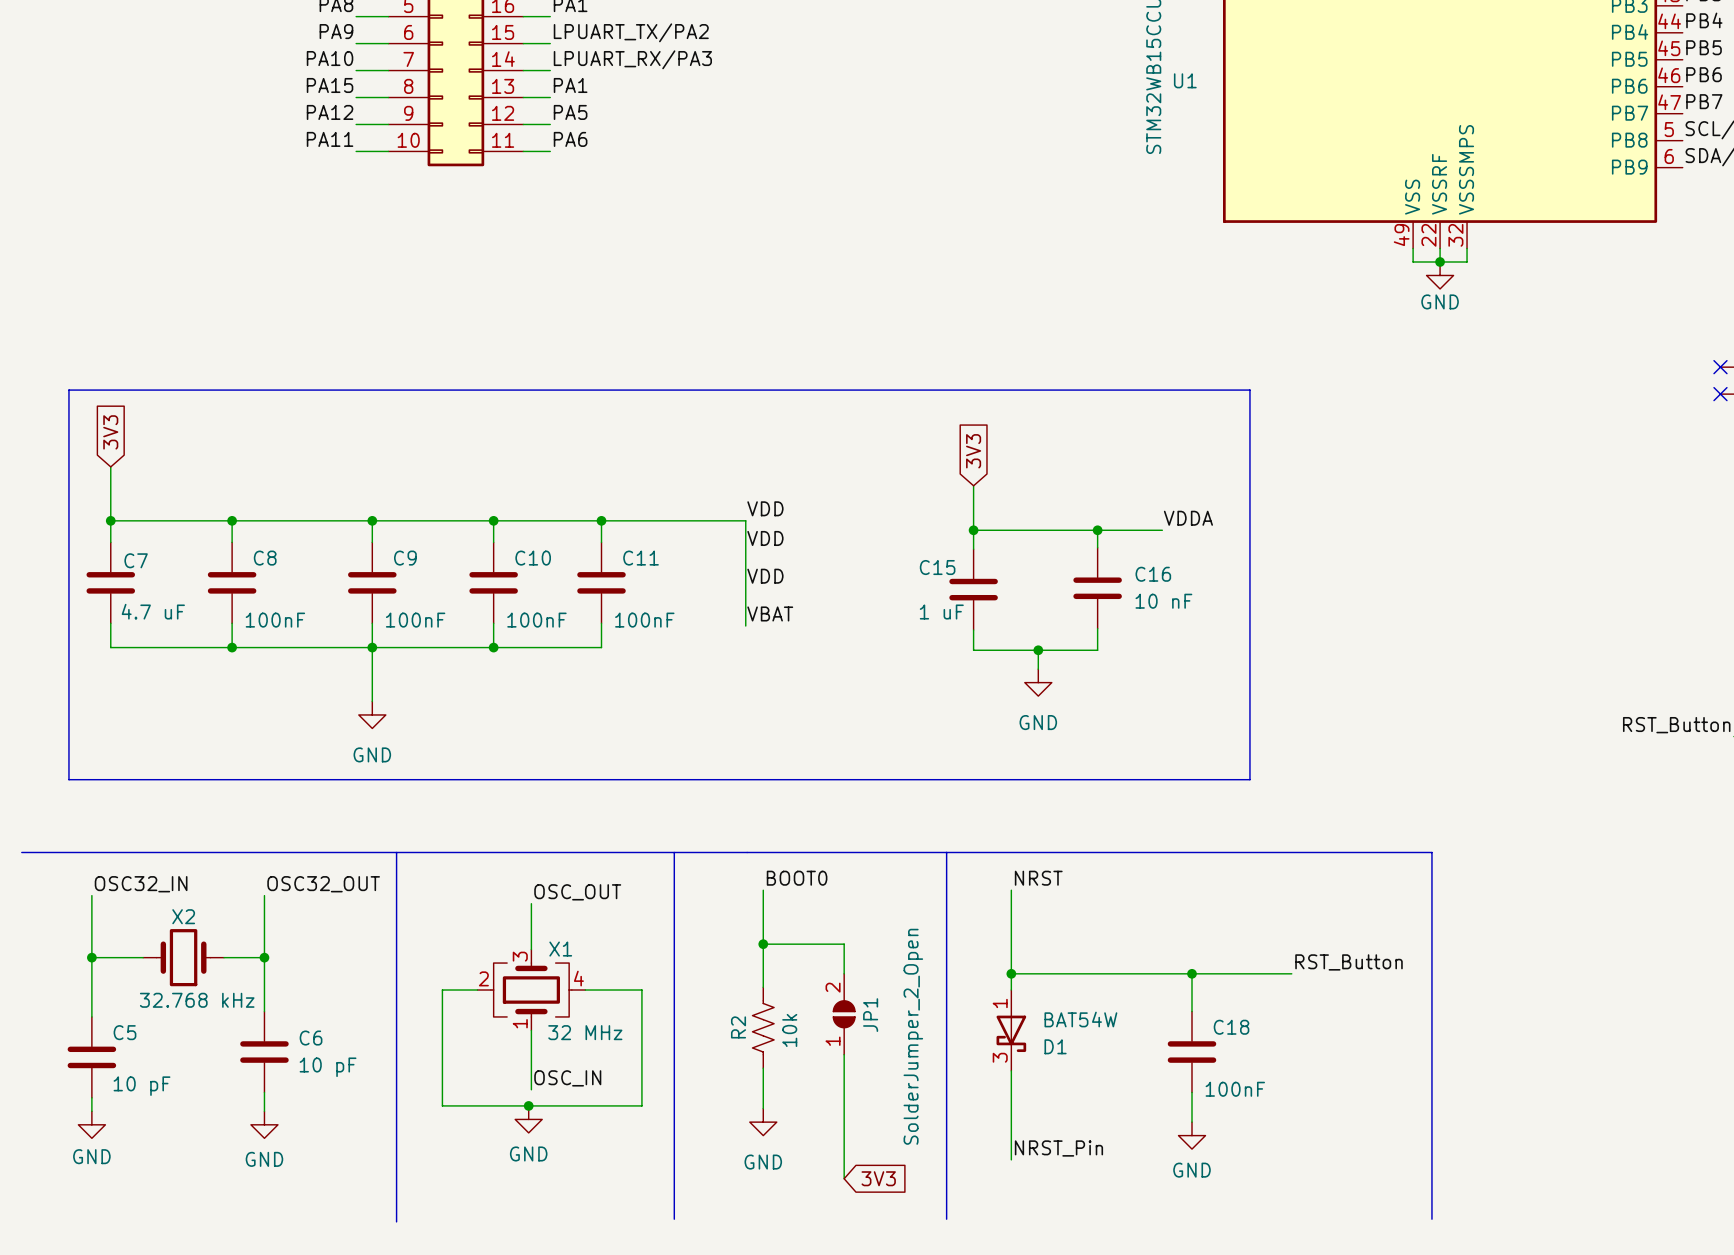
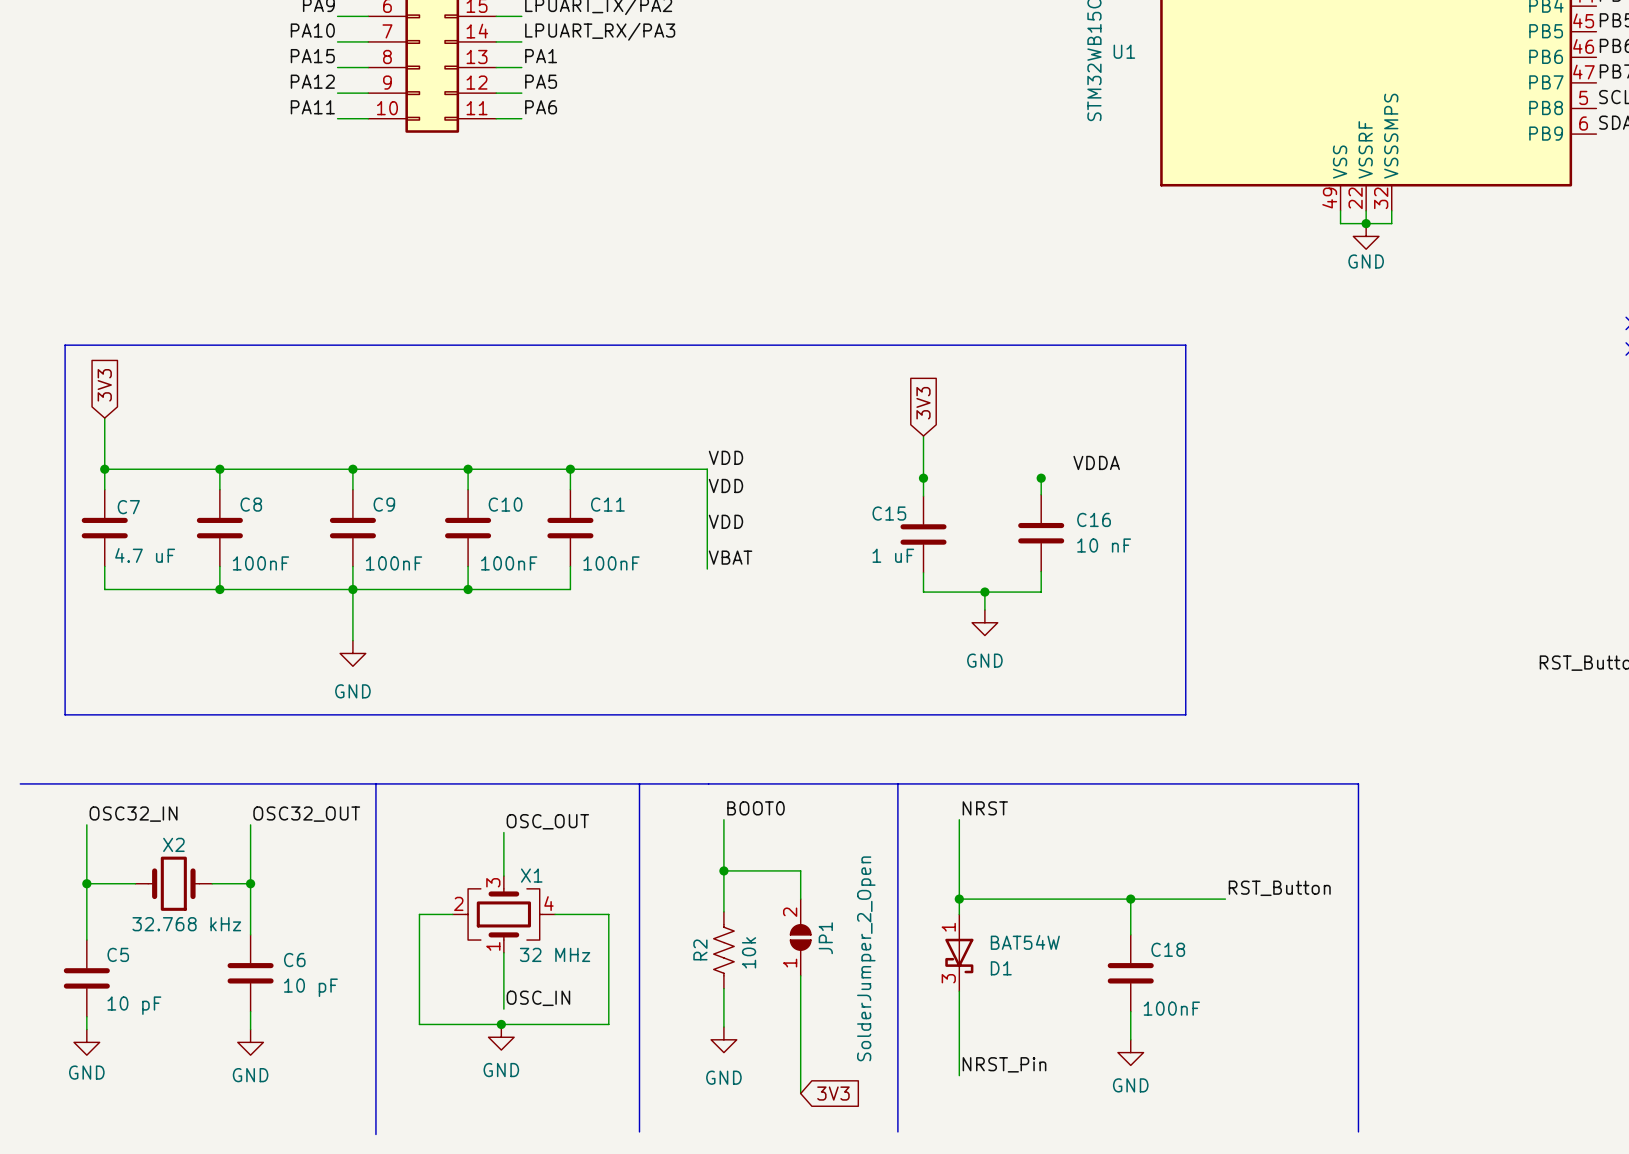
label position: VDDA (1188, 518) -> VDDA (1096, 462)
wire: (973, 530) (1162, 530) -> none

